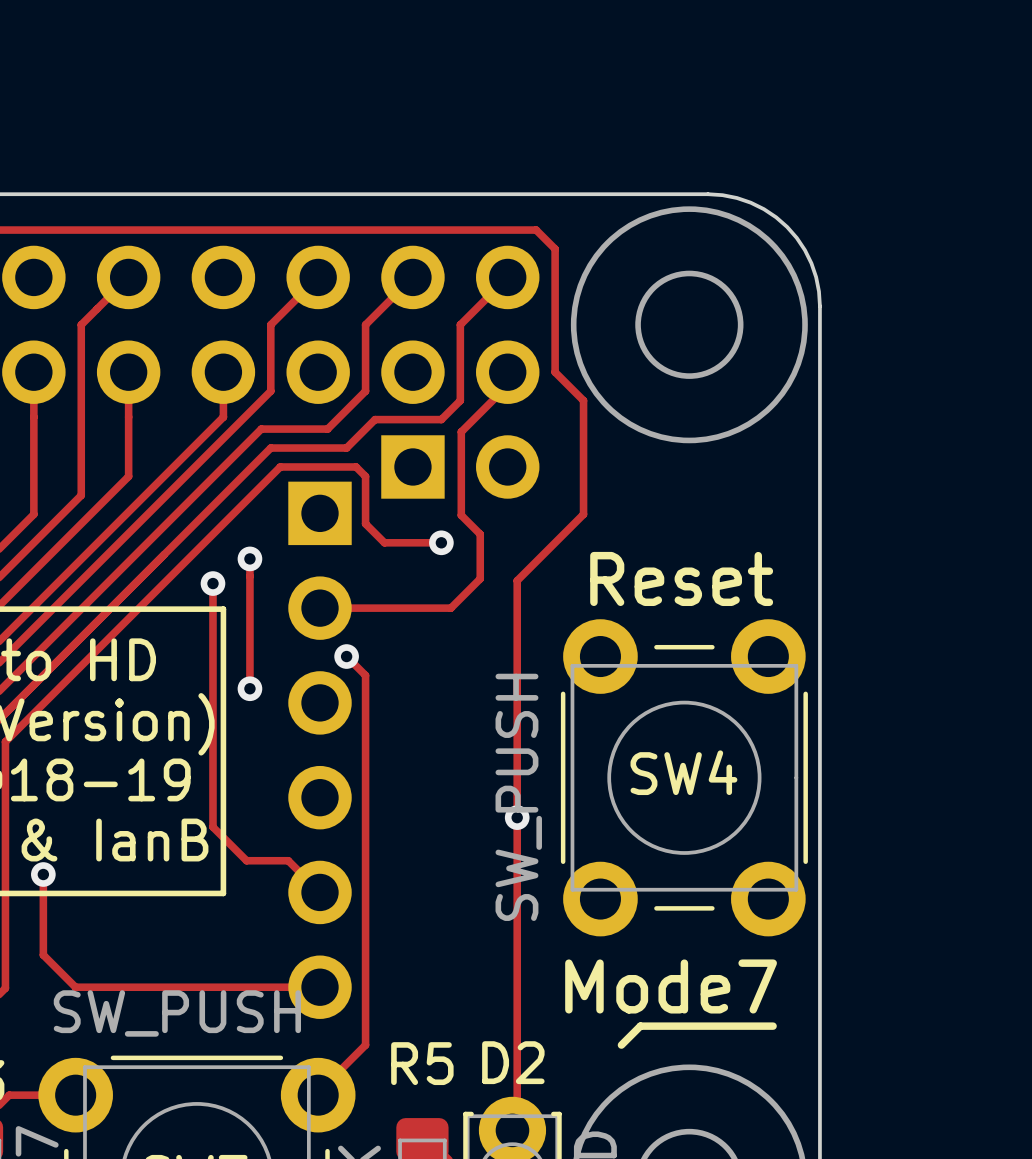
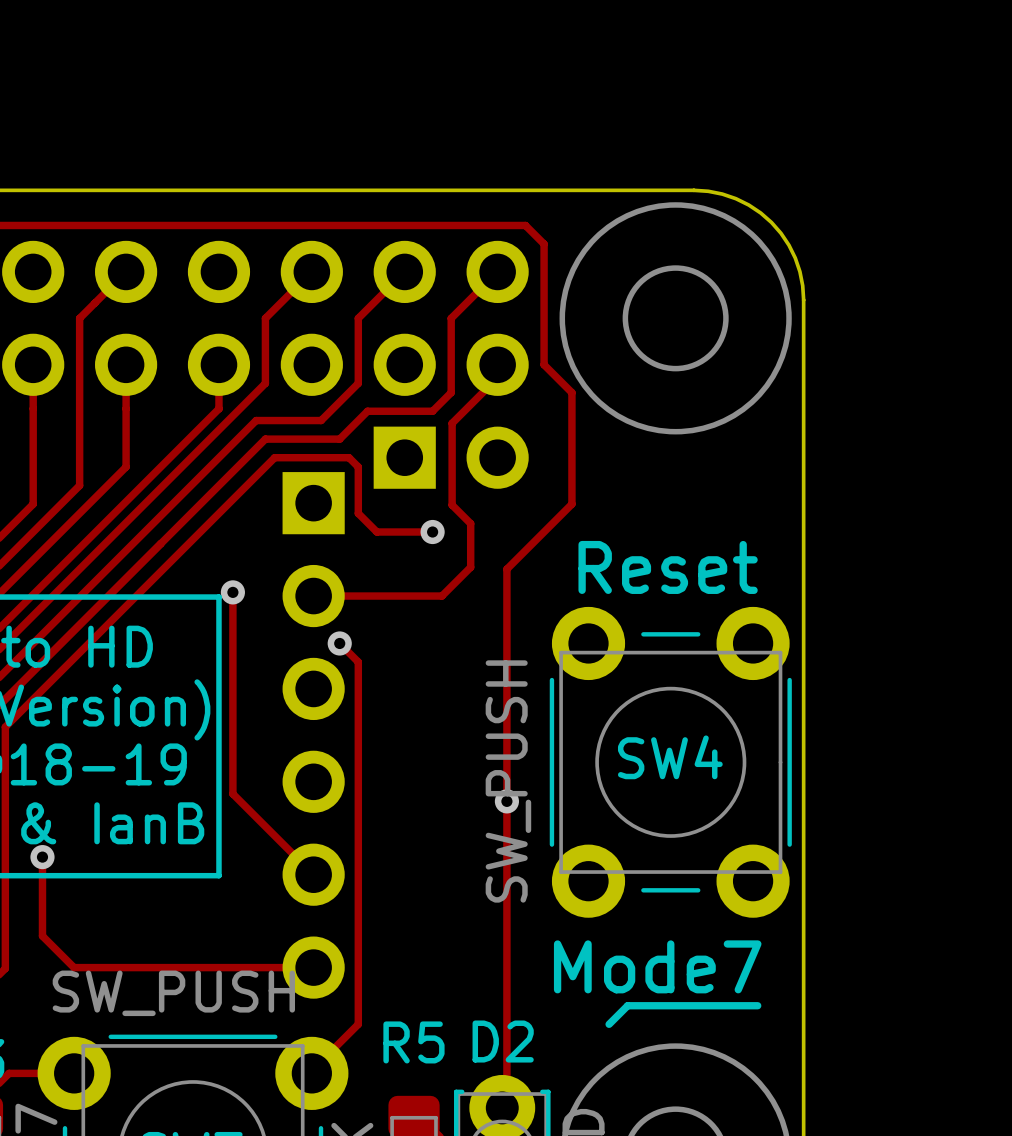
track: (249, 558) (249, 688) -> none
via: (249, 558) -> none
track: (212, 583) (212, 827) (246, 860) (288, 860) -> (232, 592) (232, 793) (282, 843)
via: (212, 583) -> none
via: none -> (232, 592)
via: (249, 688) -> none

